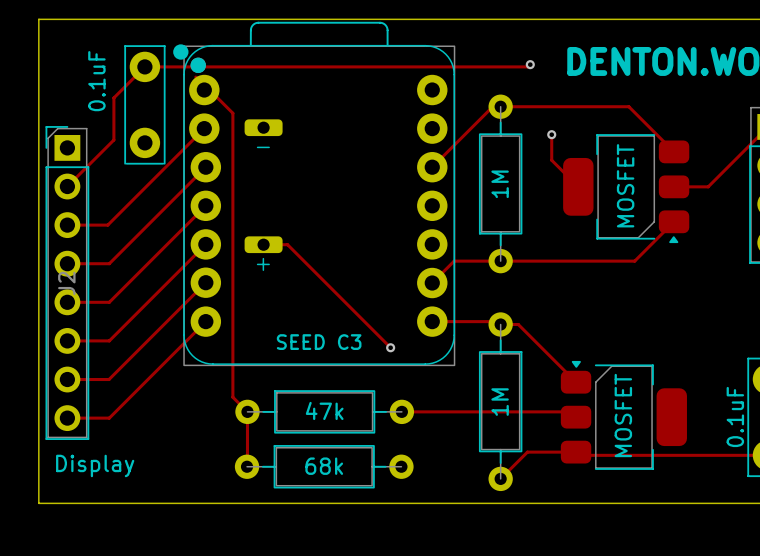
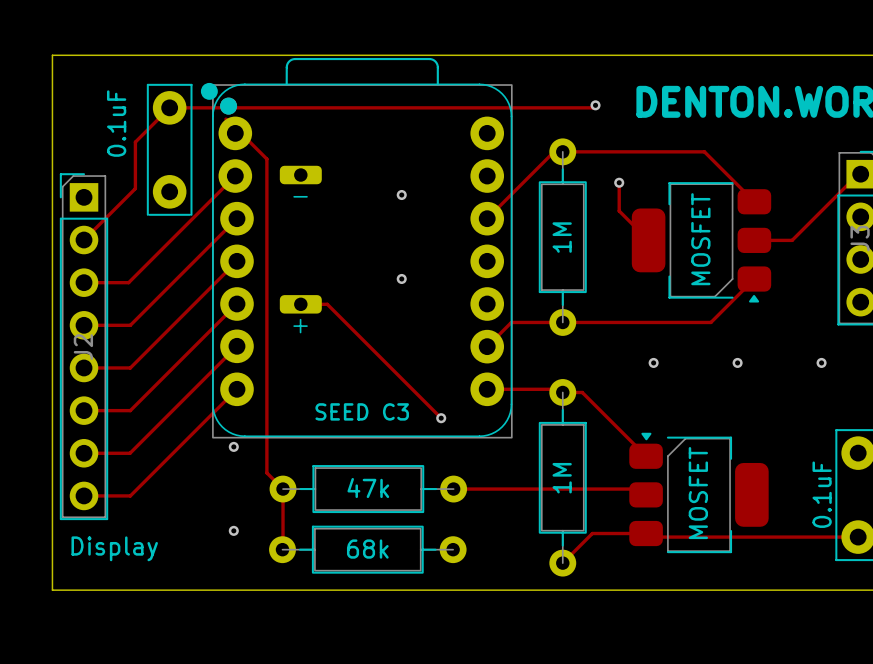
via: none -> (401, 195)
via: none -> (401, 278)
via: none -> (653, 362)
via: none -> (737, 362)
via: none -> (821, 362)
via: none -> (233, 446)
via: none -> (233, 530)

